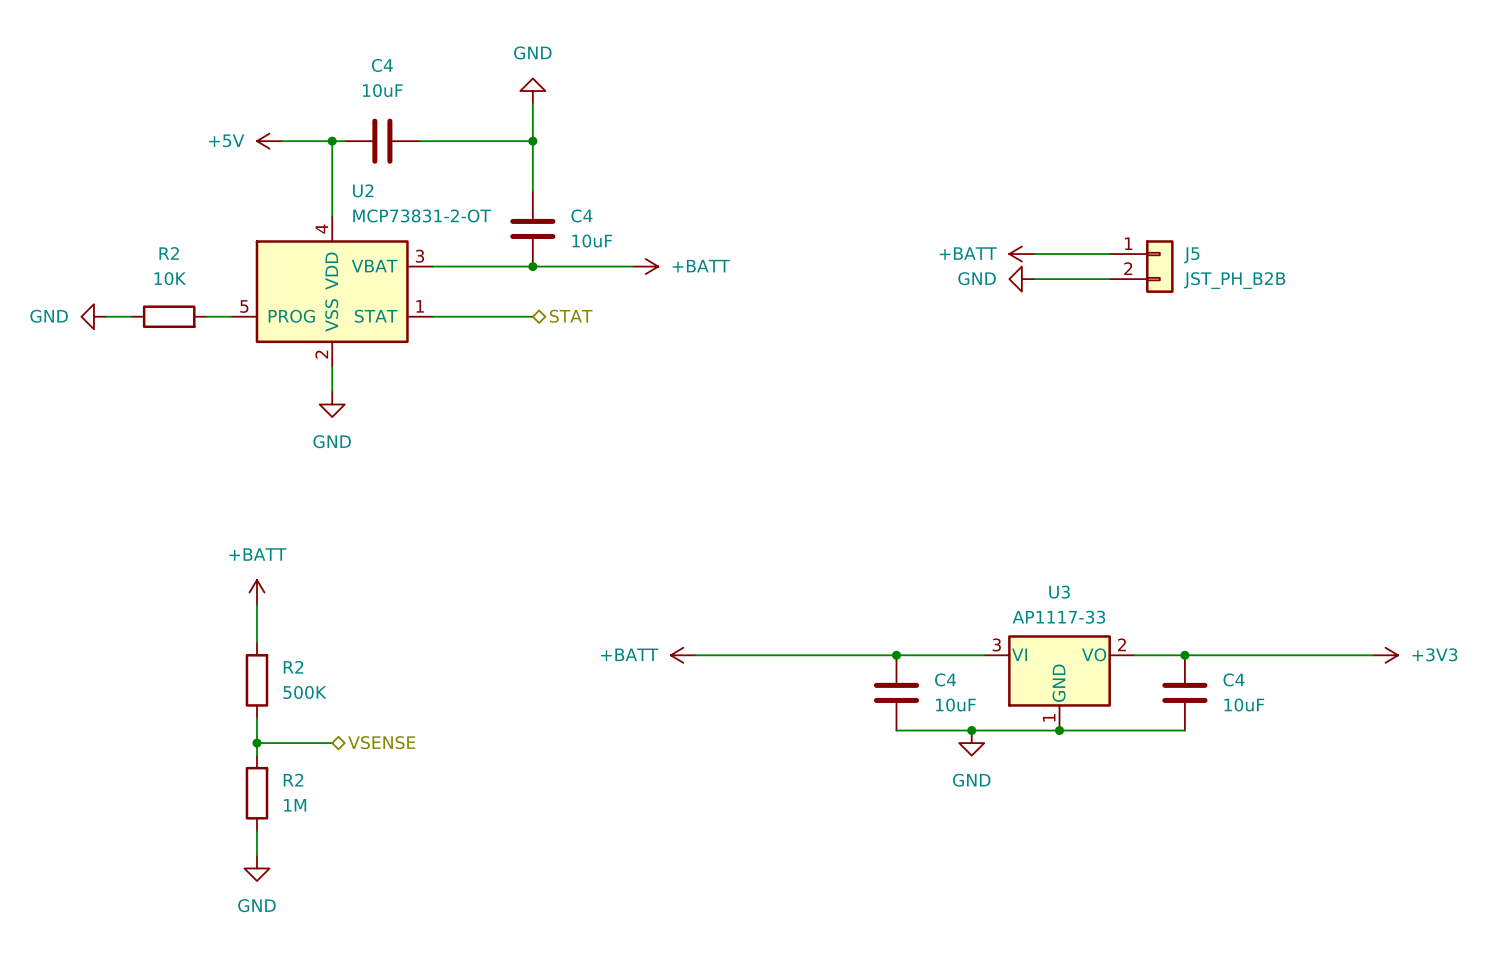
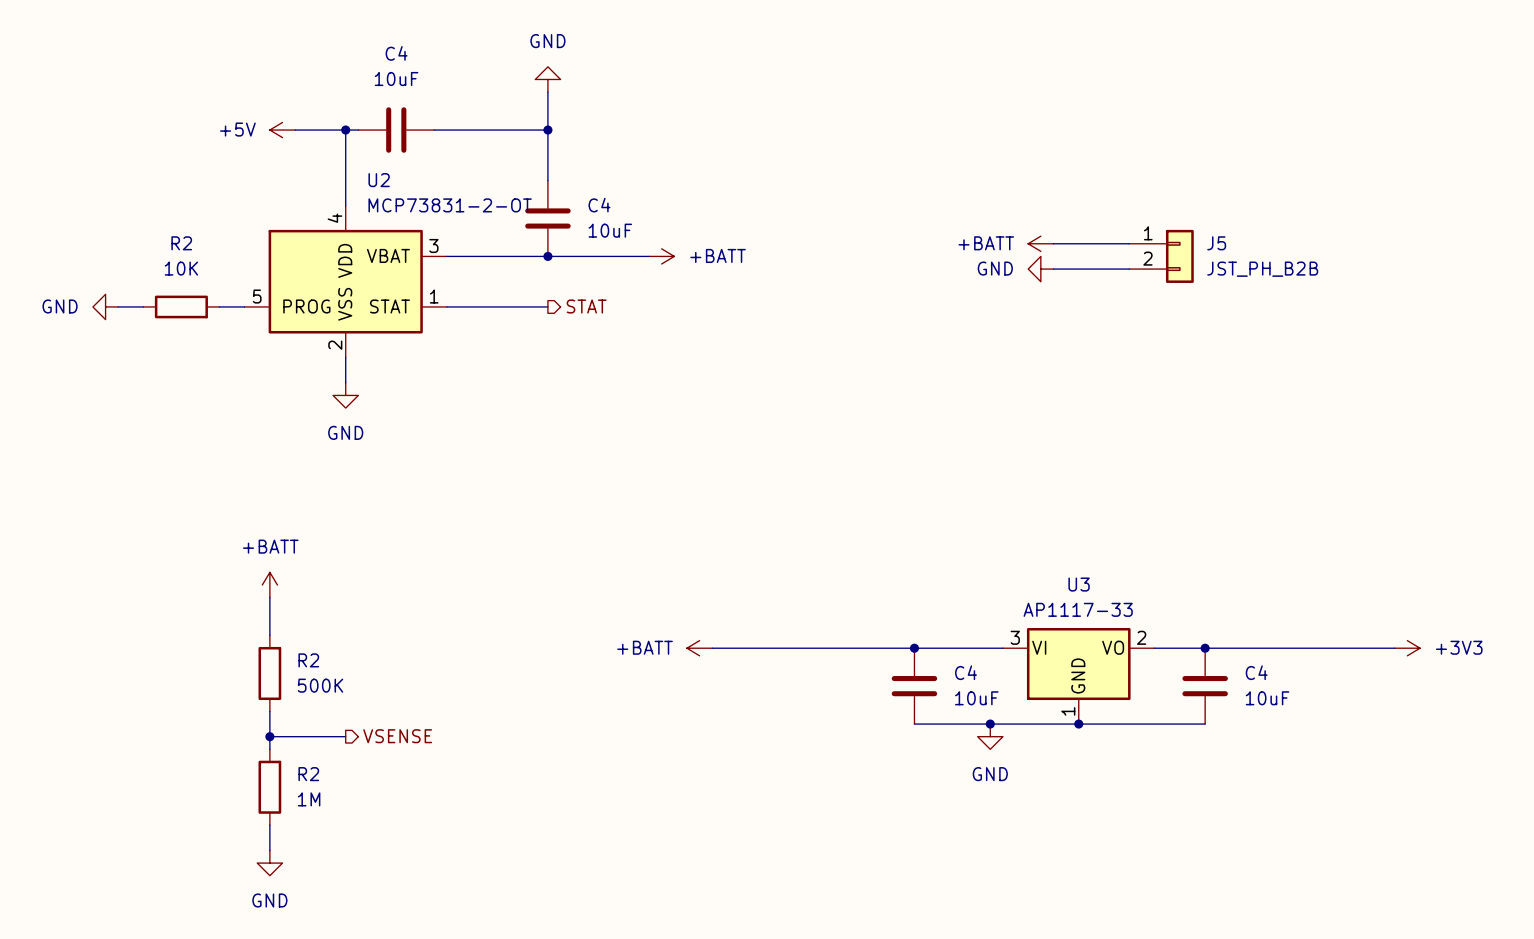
hierarchical label shape: bidirectional (571, 316) -> output (586, 306)
hierarchical label shape: bidirectional (381, 742) -> output (397, 736)

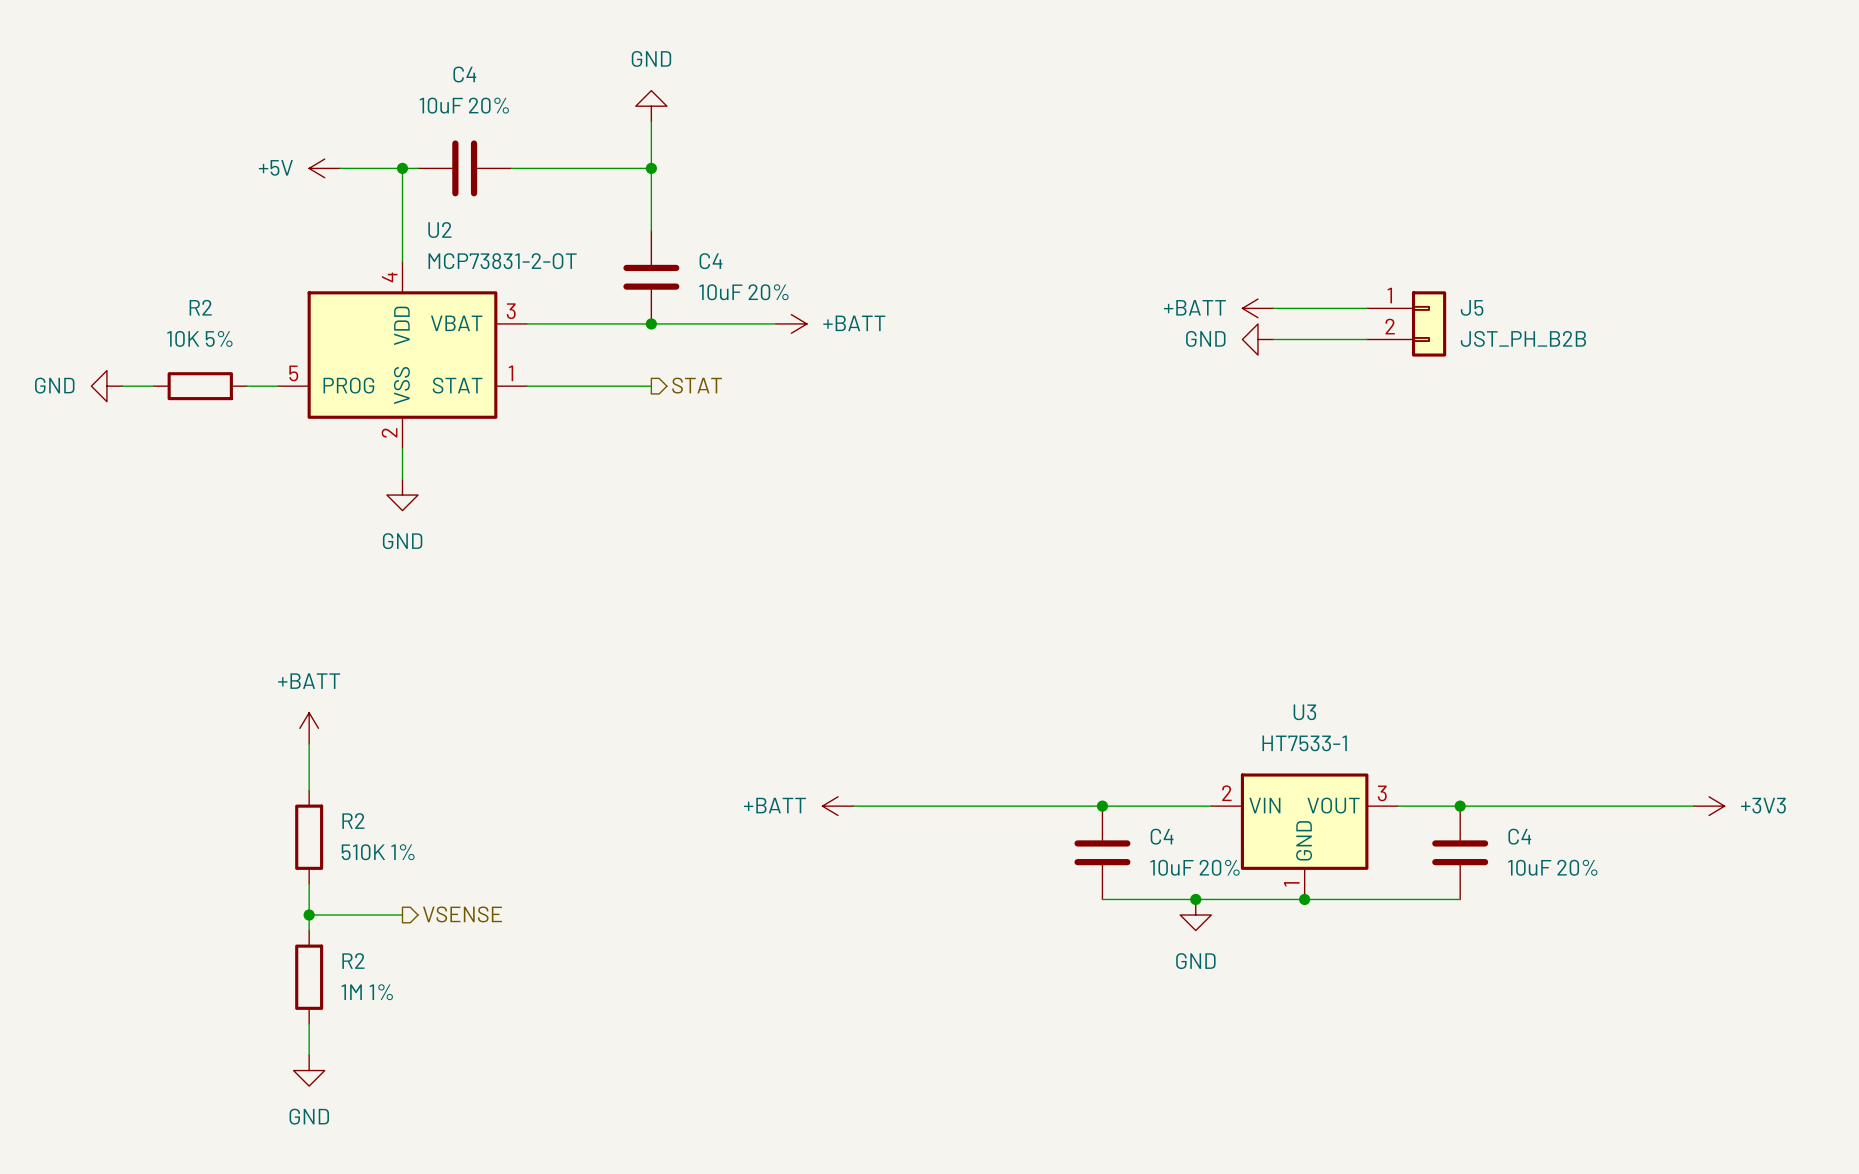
C4 value: 10uF (396, 79) -> 10uF 20% (464, 105)
C4 value: 10uF (610, 230) -> 10uF 20% (743, 292)
R2 value: 10K (181, 268) -> 10K 5% (199, 338)
U3 value: AP1117-33 (1078, 609) -> HT7533-1 (1304, 743)
U3 symbol: [1002, 627, 1155, 725] -> [1211, 773, 1398, 900]
R2 value: 500K (320, 685) -> 510K 1% (378, 852)
C4 value: 10uF (976, 698) -> 10uF 20% (1195, 867)
C4 value: 10uF (1267, 698) -> 10uF 20% (1552, 867)
R2 value: 1M (309, 799) -> 1M 1% (367, 992)

